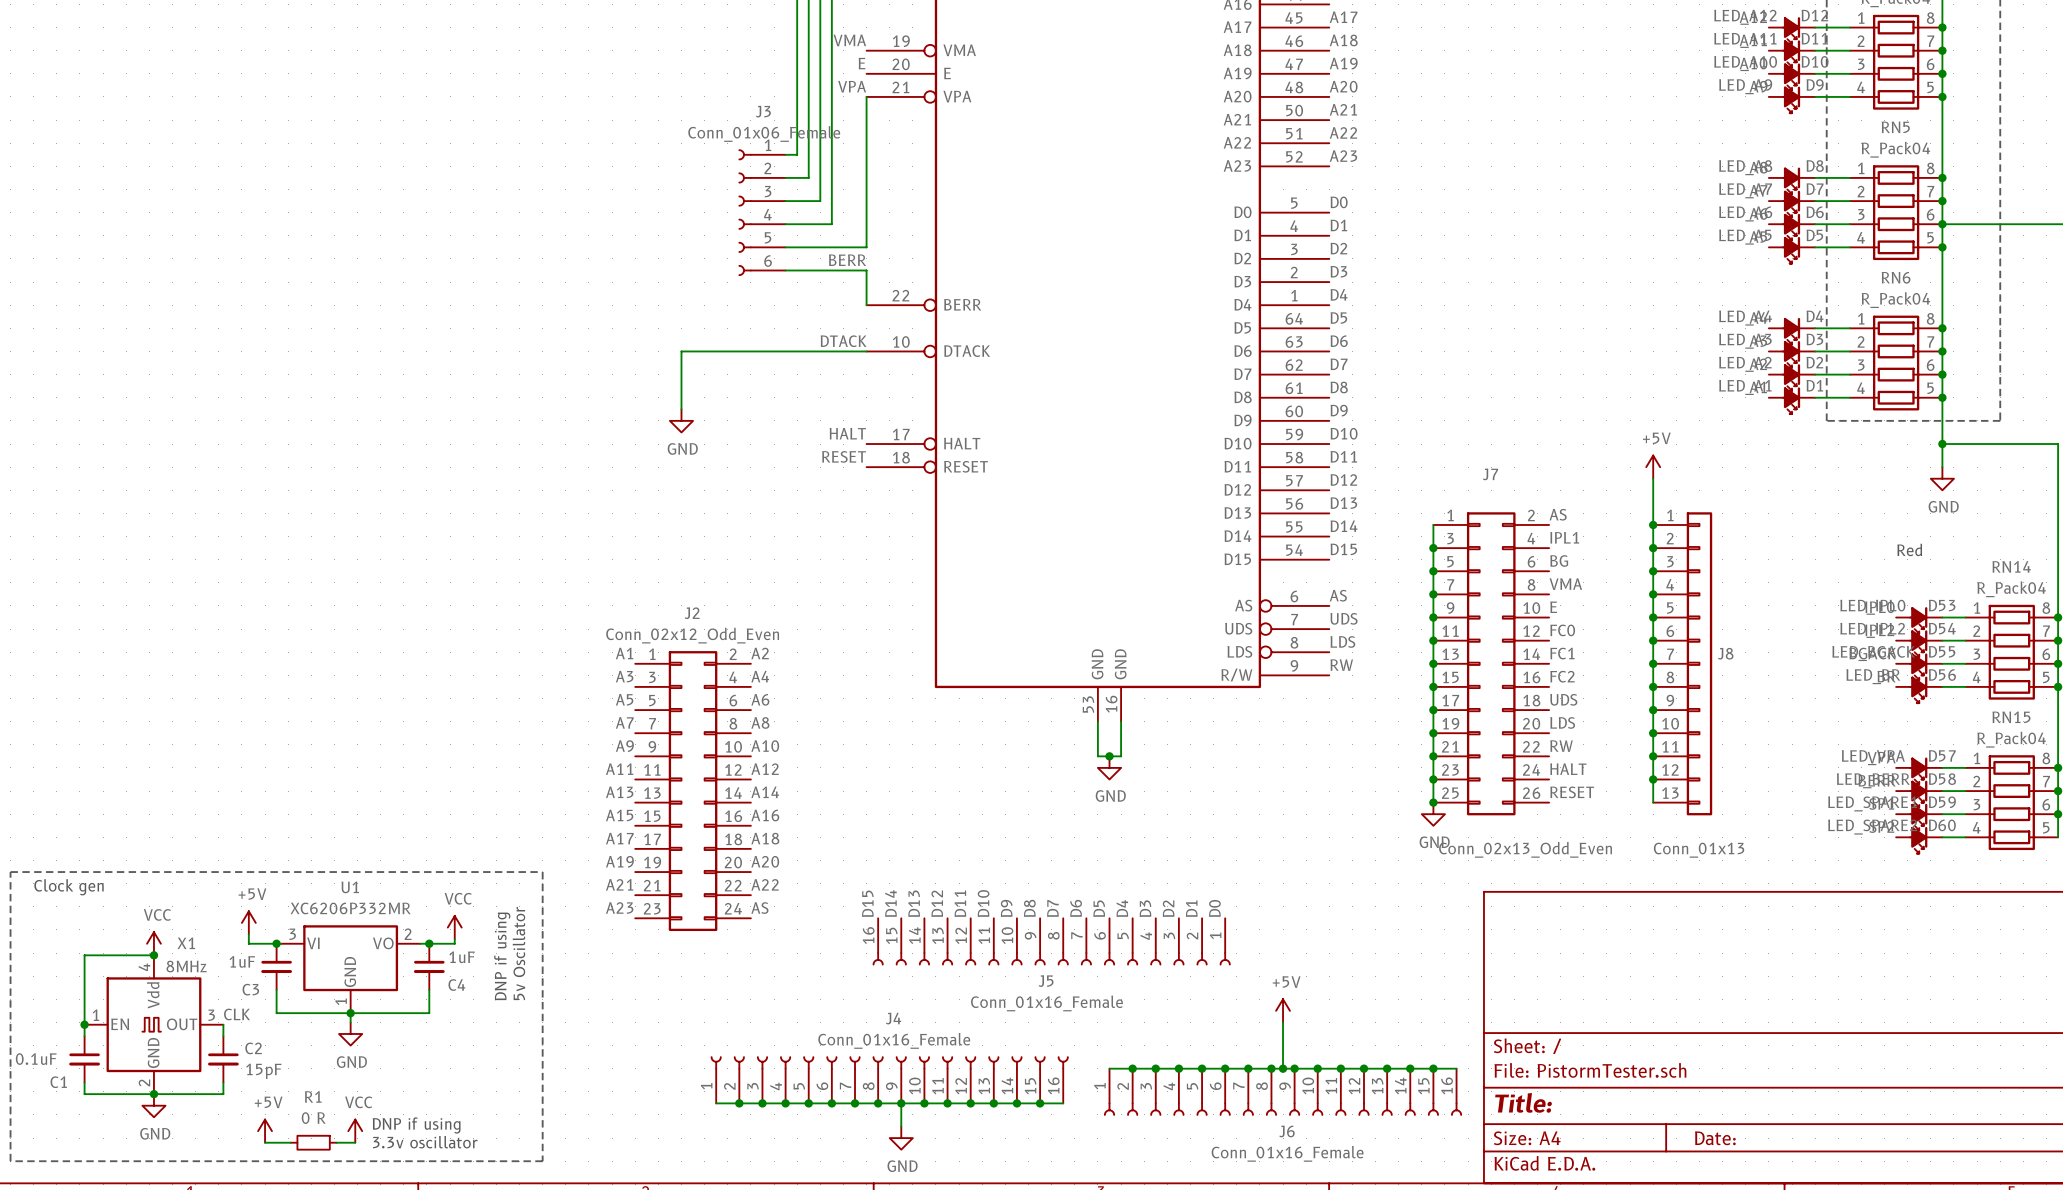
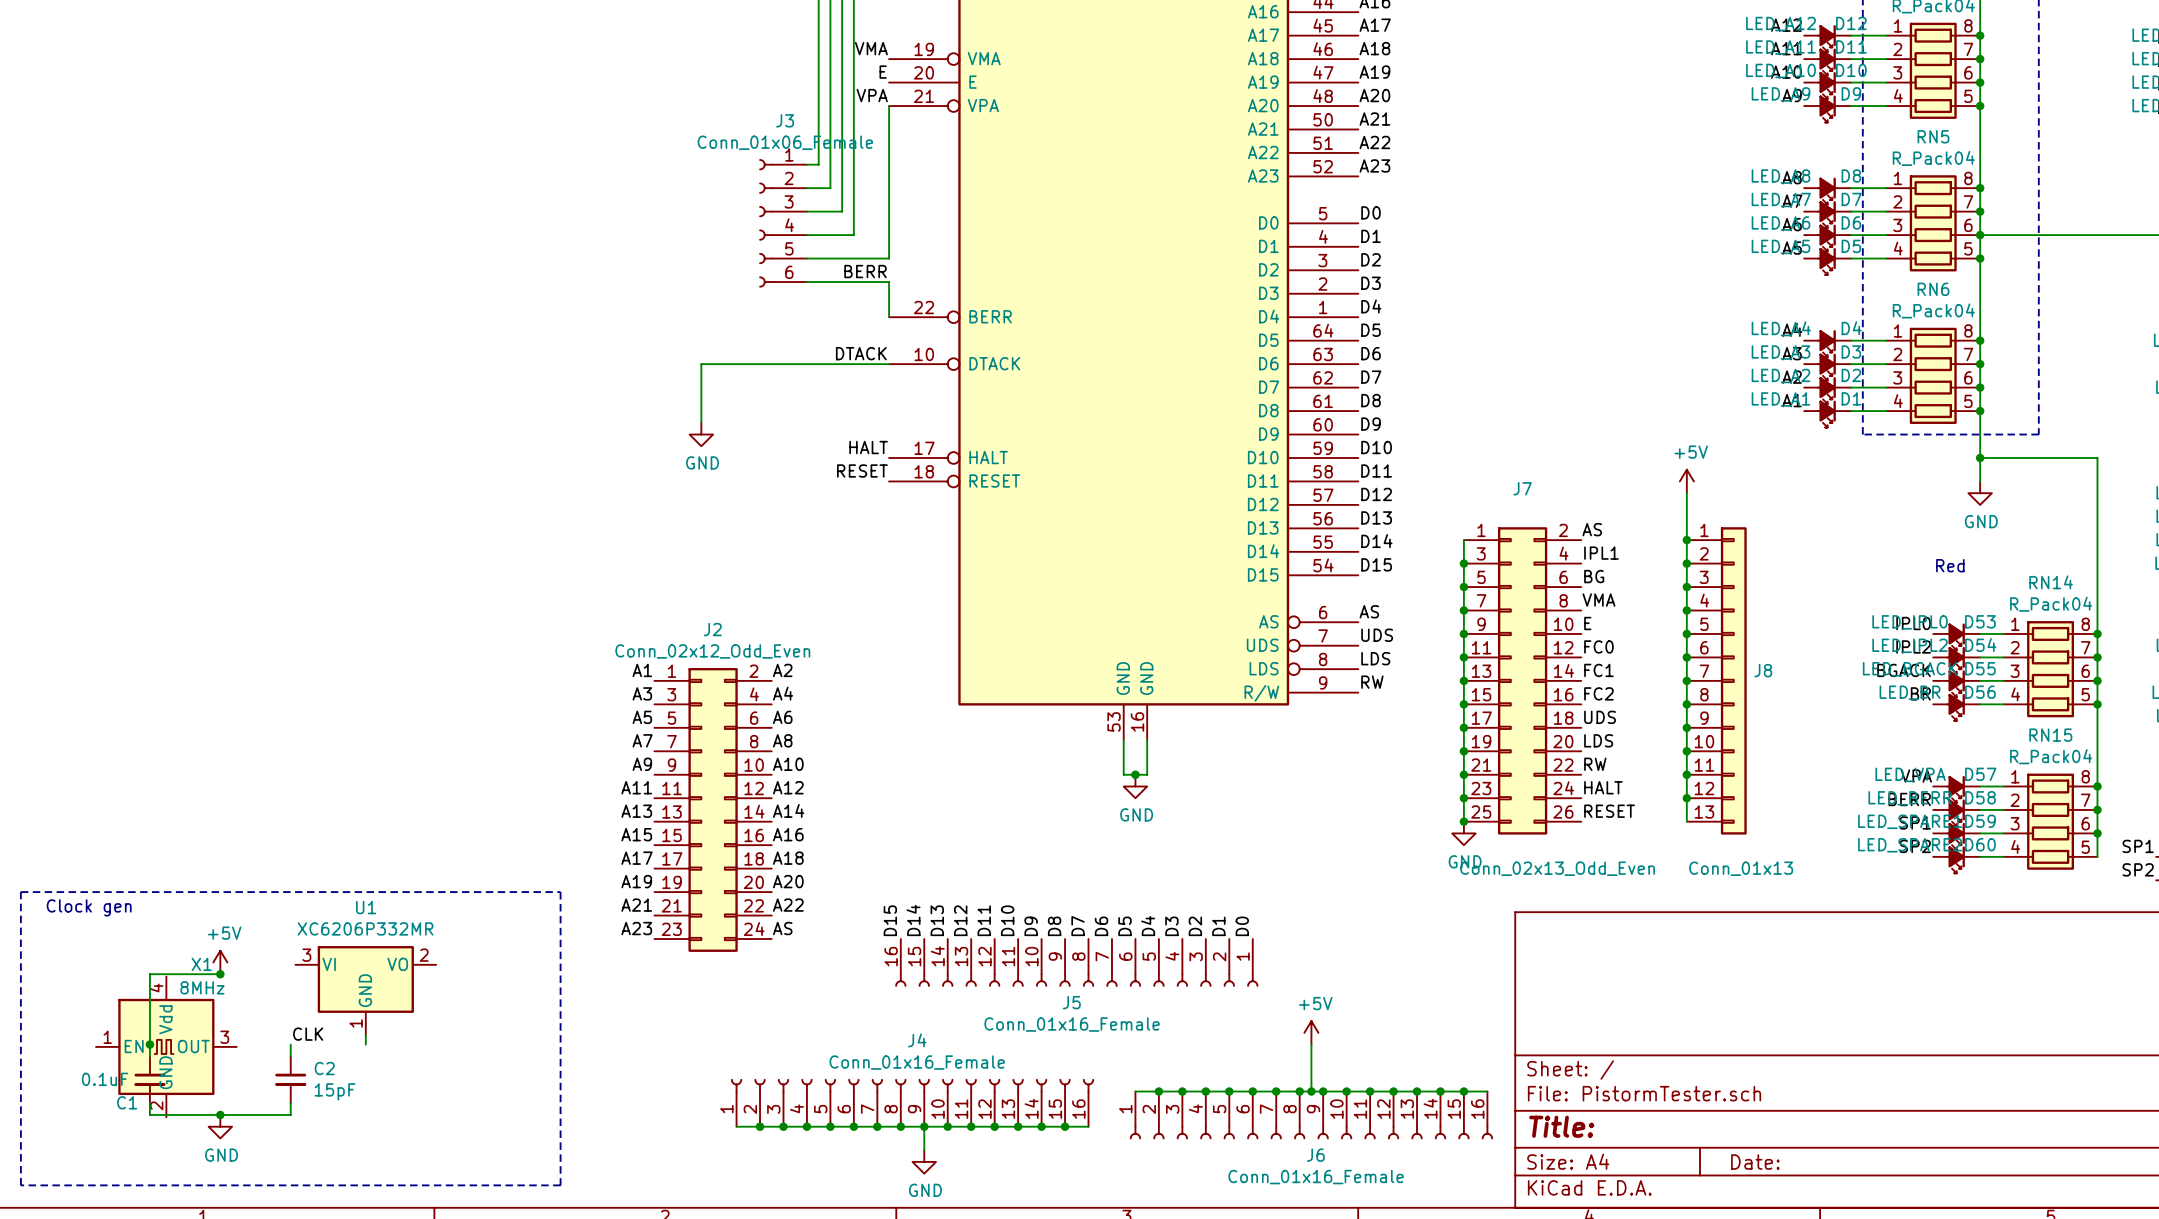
power symbol position: +5V (248, 922) -> +5V (220, 962)
power symbol: VCC (454, 927) -> none
wire: (248, 934) (248, 943) (281, 943) -> none
wire: (454, 939) (454, 943) (420, 943) -> none
power symbol: VCC (153, 943) -> none
junction: (276, 943) -> none
junction: (429, 943) -> none
junction: none -> (220, 974)
text: 5v Oscillator (518, 953) -> none
wire: (153, 955) (84, 955) (84, 1036) -> (220, 974) (149, 974) (149, 1056)
junction: (153, 955) -> none
text: DNP if using (502, 956) -> none
C3: 1uF (276, 966) -> none
C4: 1uF (429, 966) -> none
wire: (276, 990) (276, 1013) (429, 1013) (429, 990) -> none
junction: (350, 1013) -> none
label position: CLK (237, 1014) -> CLK (308, 1034)
junction: none -> (149, 1044)
junction: (84, 1024) -> none
wire: (223, 1024) (223, 1036) -> (290, 1044) (290, 1056)
power symbol: GND (350, 1033) -> none
C1 position: (84, 1059) -> (149, 1079)
C2 position: (223, 1059) -> (290, 1079)
wire: (84, 1082) (84, 1094) (223, 1094) (223, 1082) -> (149, 1103) (149, 1114) (290, 1114) (290, 1103)
junction: none -> (220, 1114)
junction: (153, 1094) -> none
power symbol position: GND (153, 1105) -> GND (220, 1126)
text: DNP if using (416, 1125) -> none
power symbol: +5V (265, 1131) -> none
power symbol: VCC (355, 1131) -> none
wire: (265, 1142) (290, 1142) -> none
R1: 0 R (313, 1142) -> none
wire: (336, 1142) (355, 1142) -> none
text: 3.3v oscillator (425, 1142) -> none

